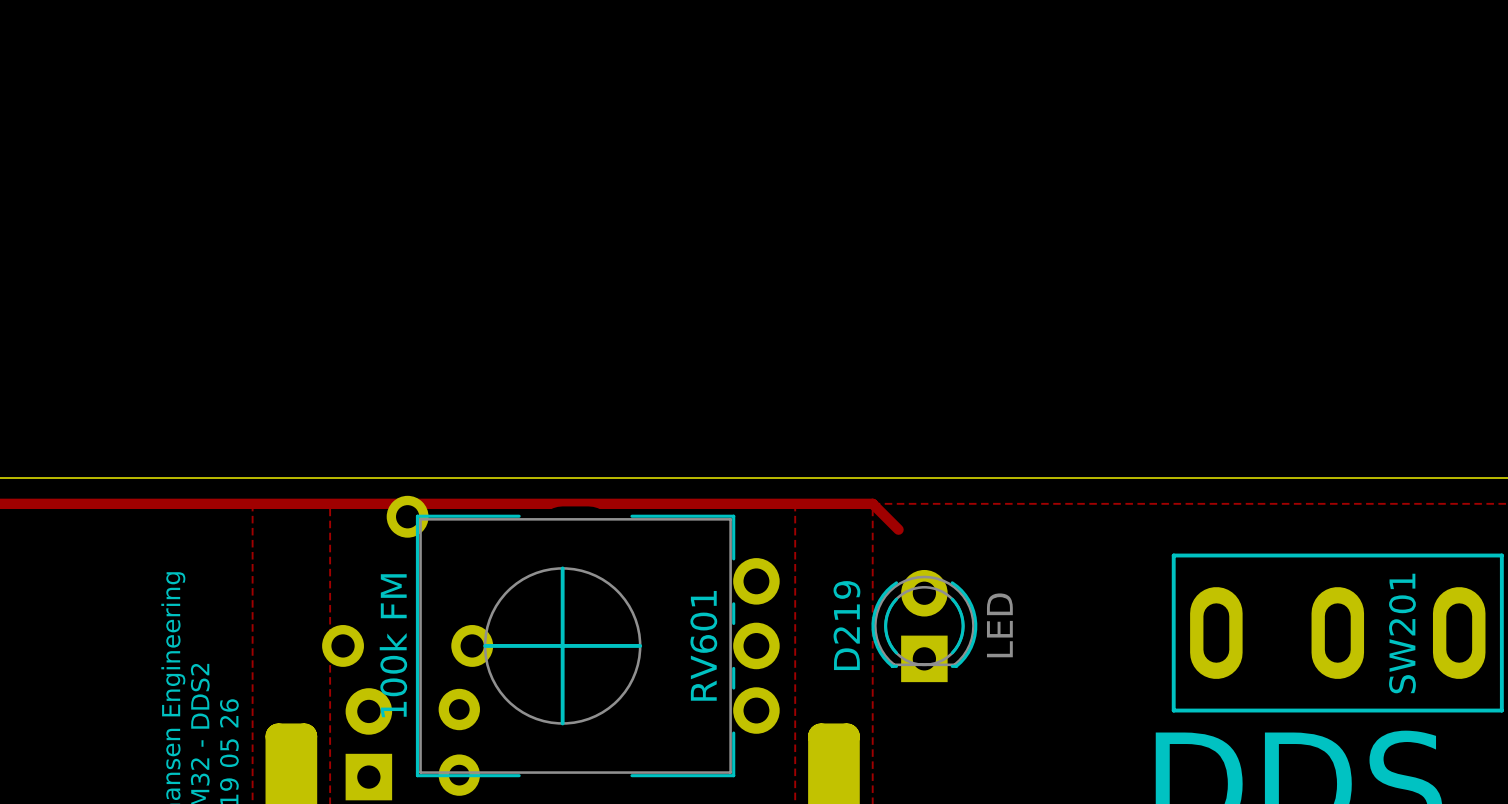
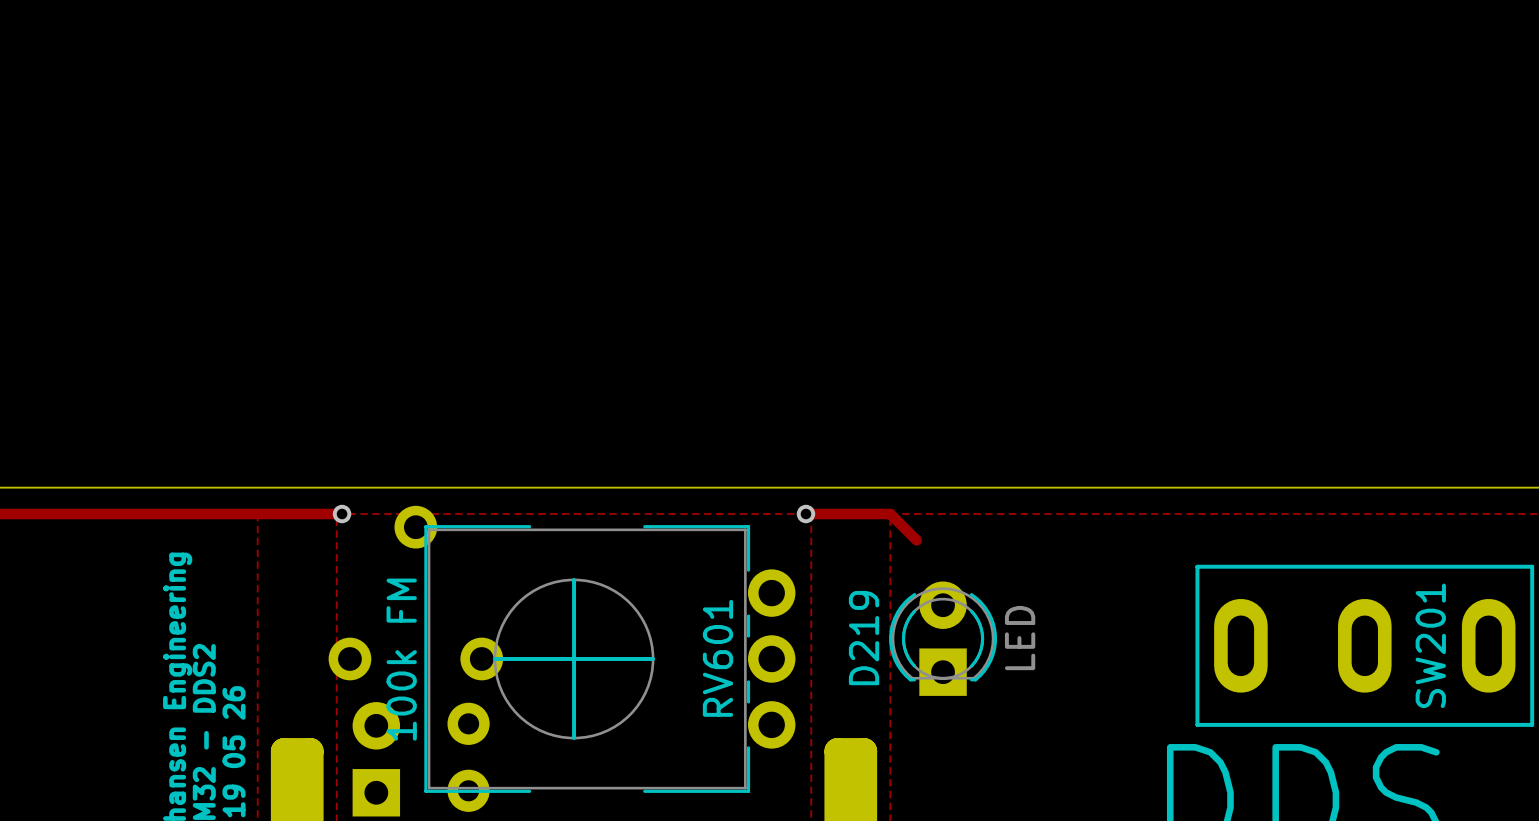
track: (335, 503) (790, 503) -> none
via: none -> (342, 514)
via: none -> (805, 514)

